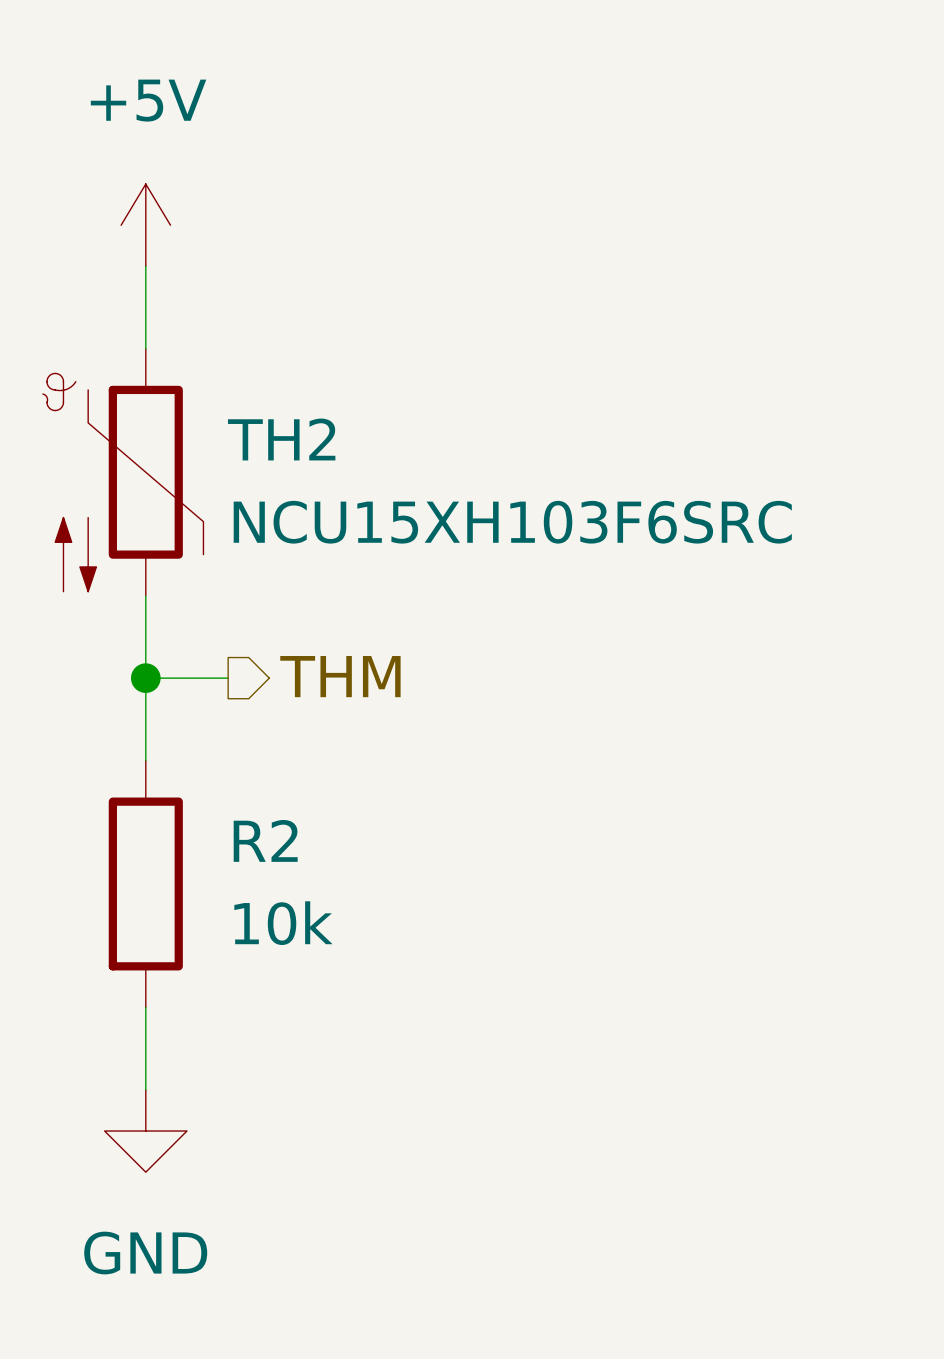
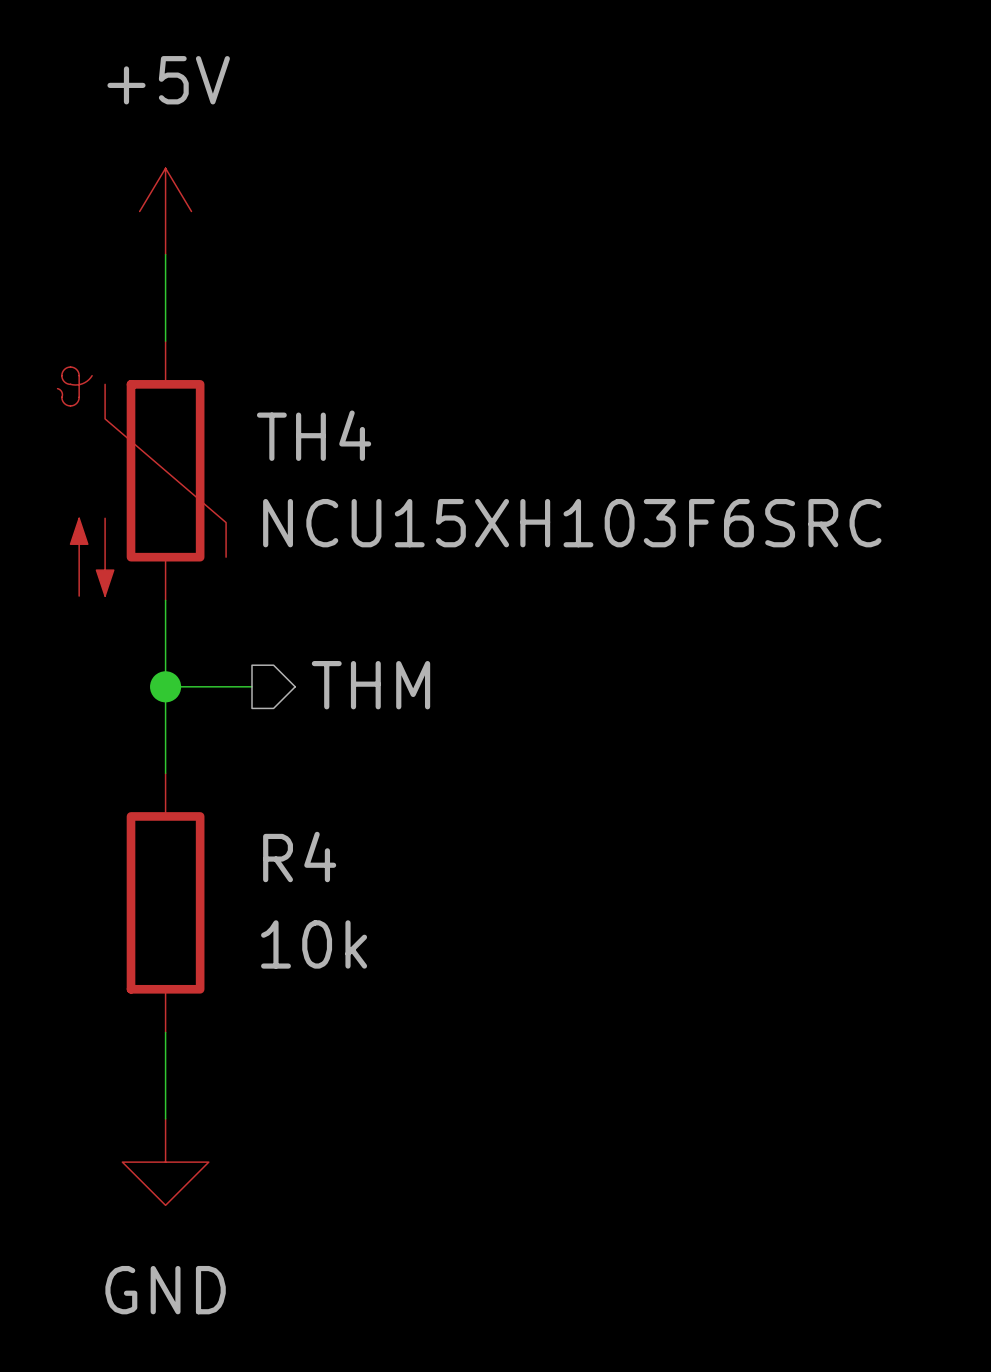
TH2 name: TH2 (281, 439) -> TH4 (314, 435)
R2 name: R2 (265, 840) -> R4 (299, 857)

